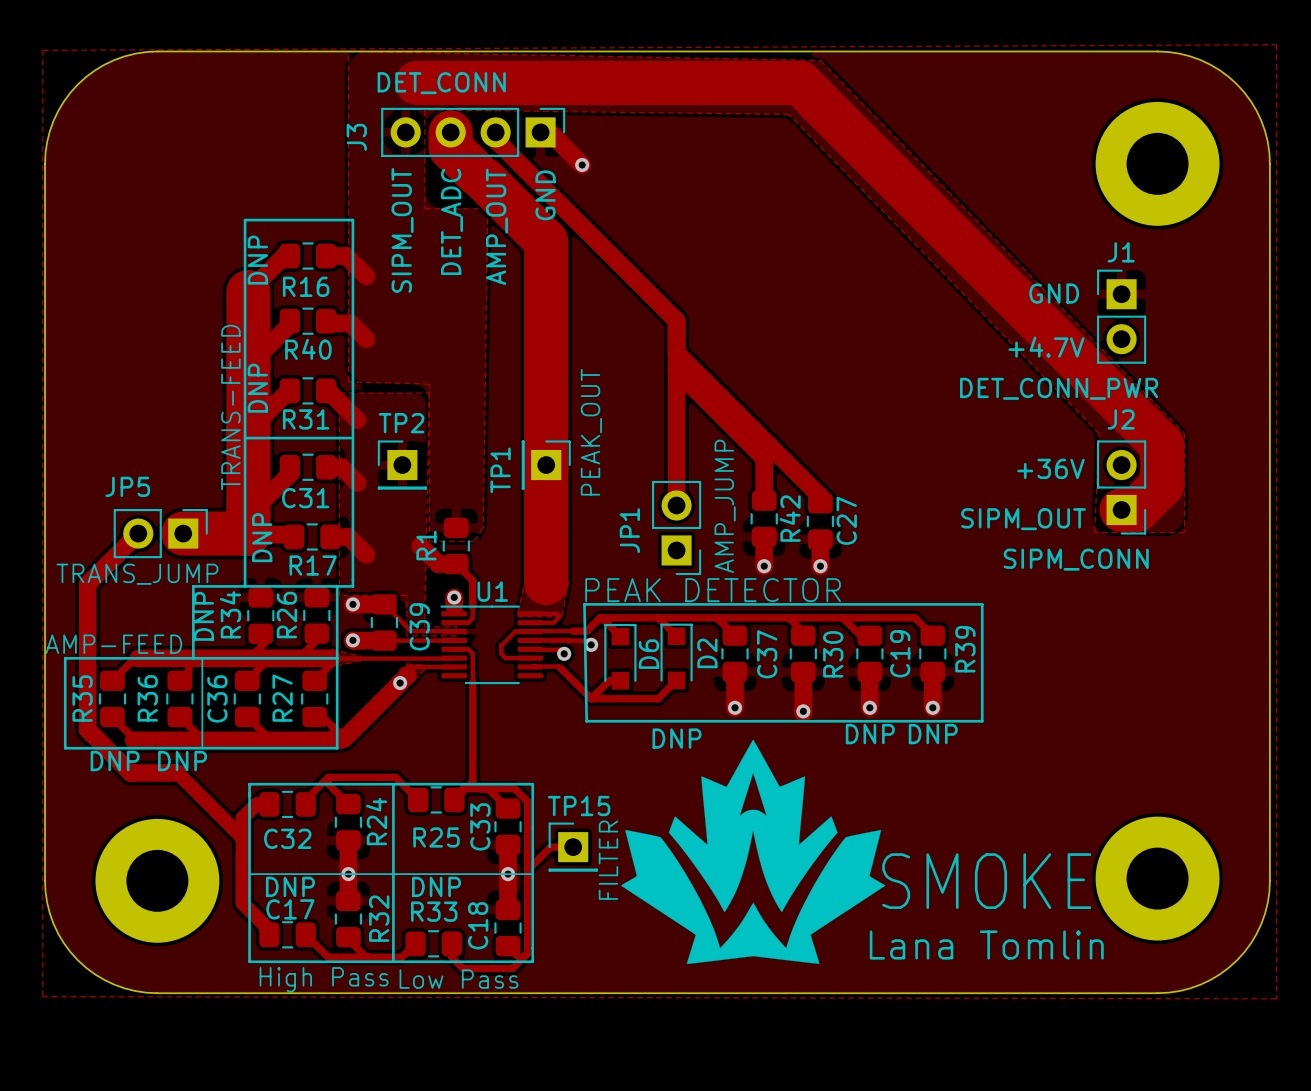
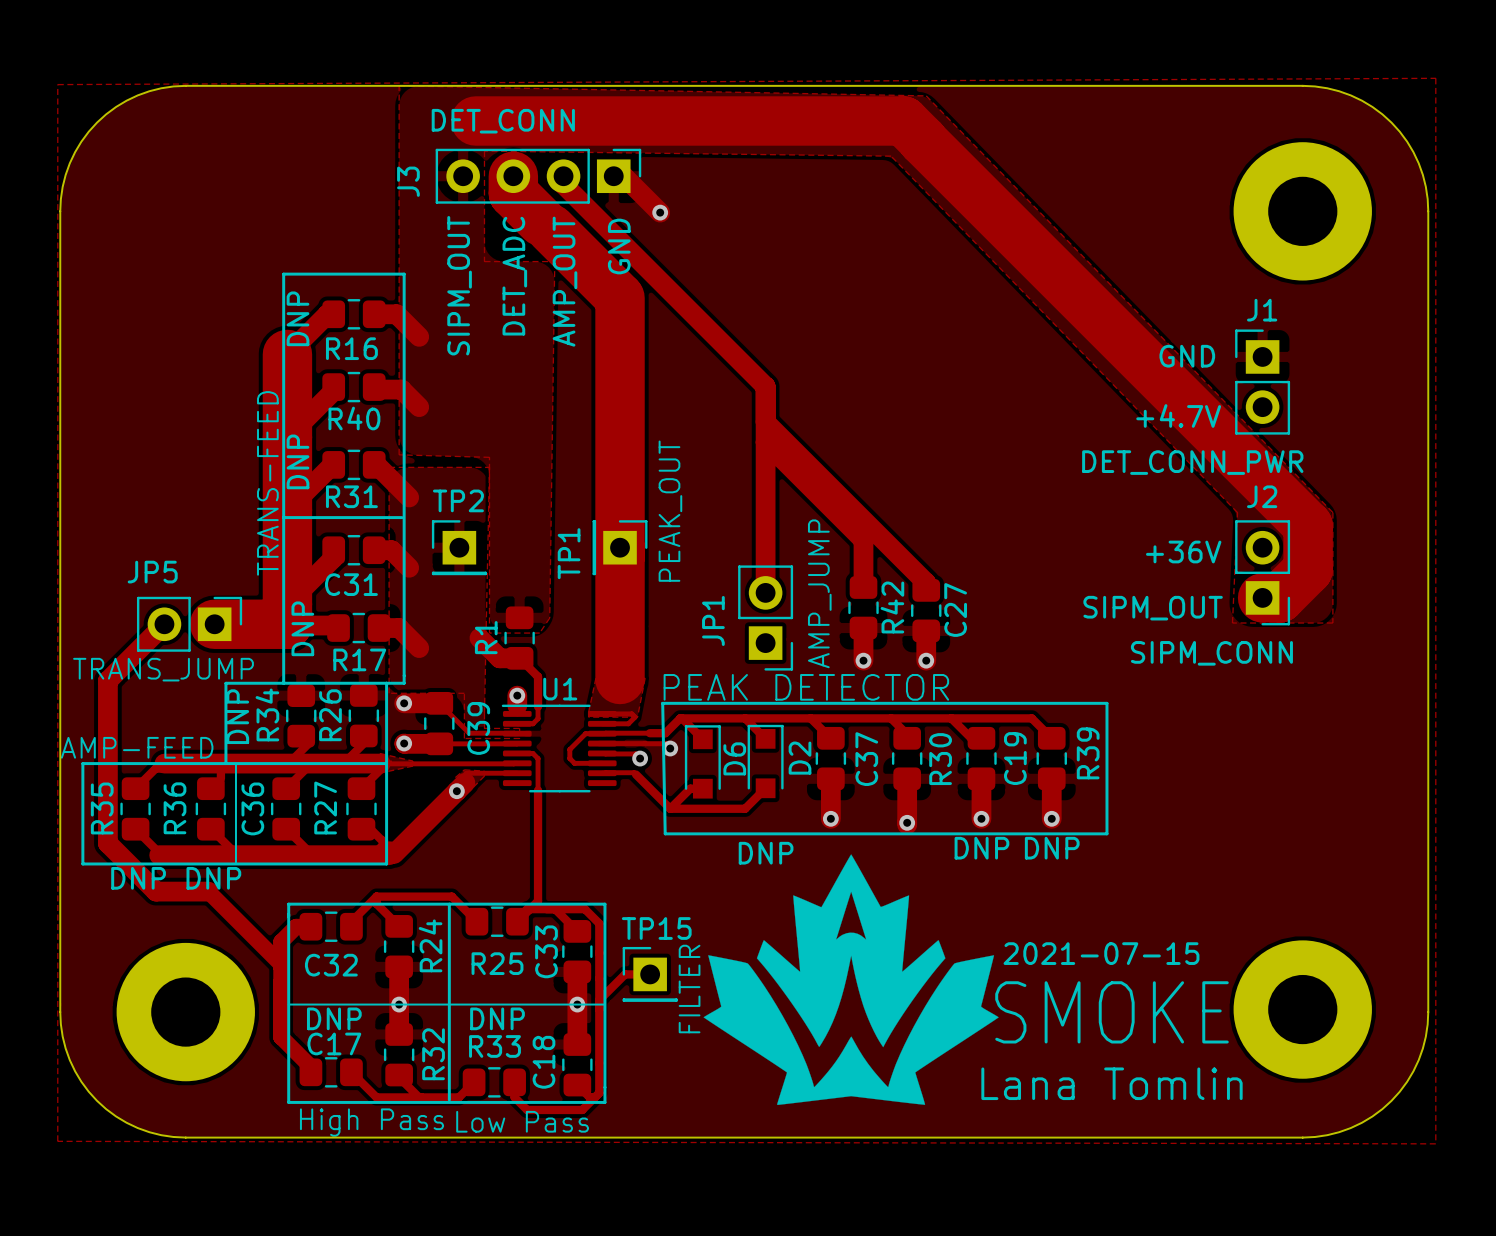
text: none -> 2021-07-15 (1101, 953)

